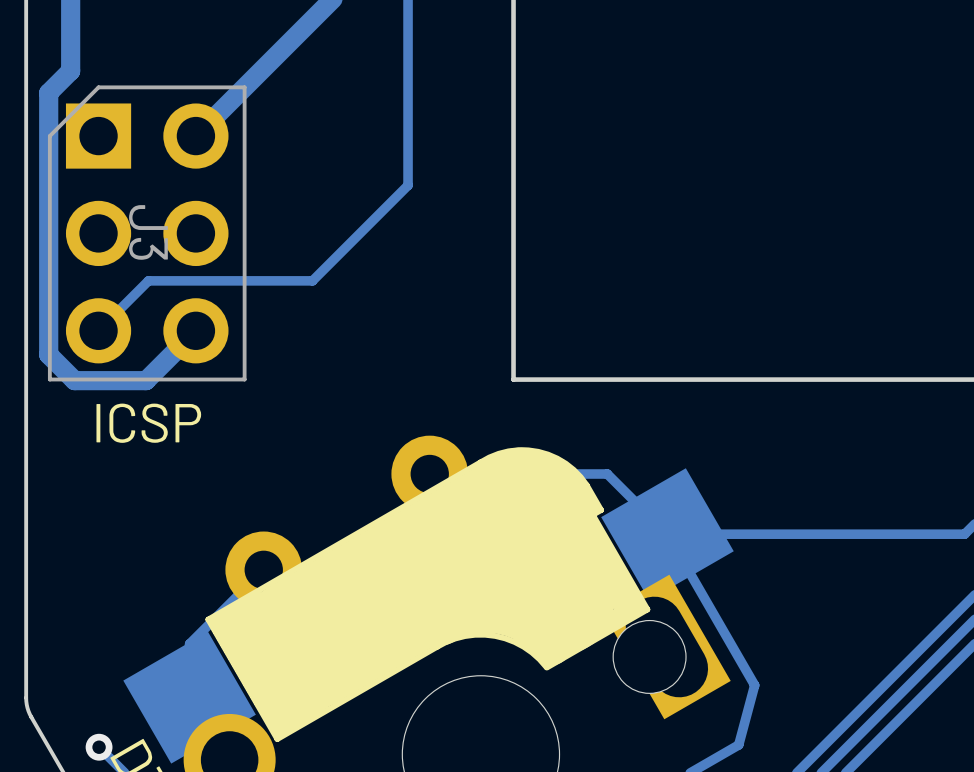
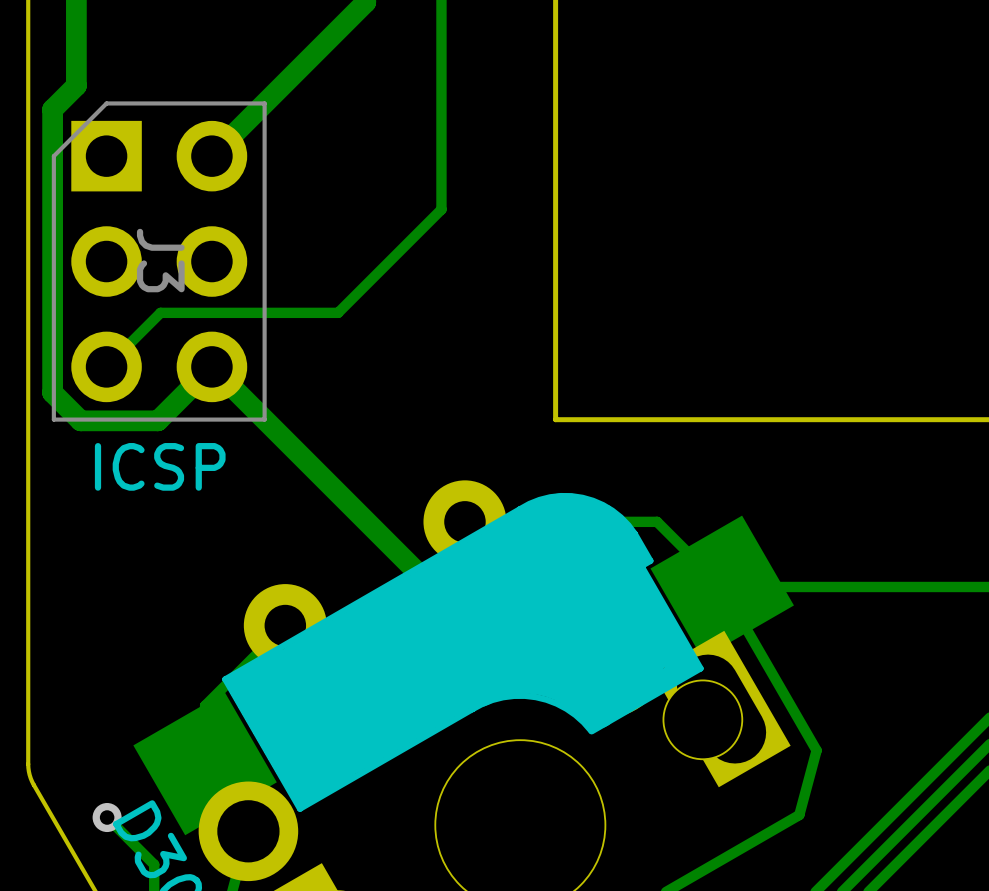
track: none -> (211, 366) (429, 584)

